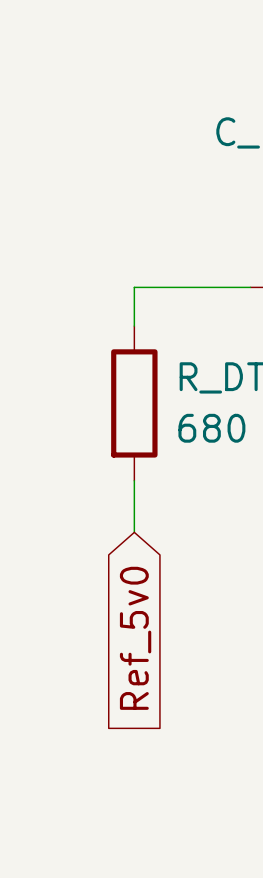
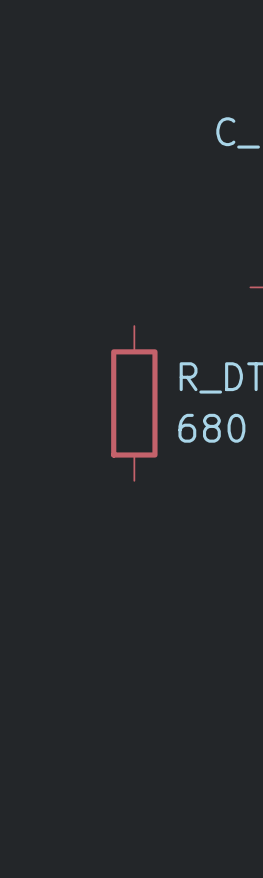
wire: (250, 287) (134, 287) (134, 326) -> none
wire: (134, 480) (134, 532) -> none
global label: Ref_5v0 (135, 638) -> none

